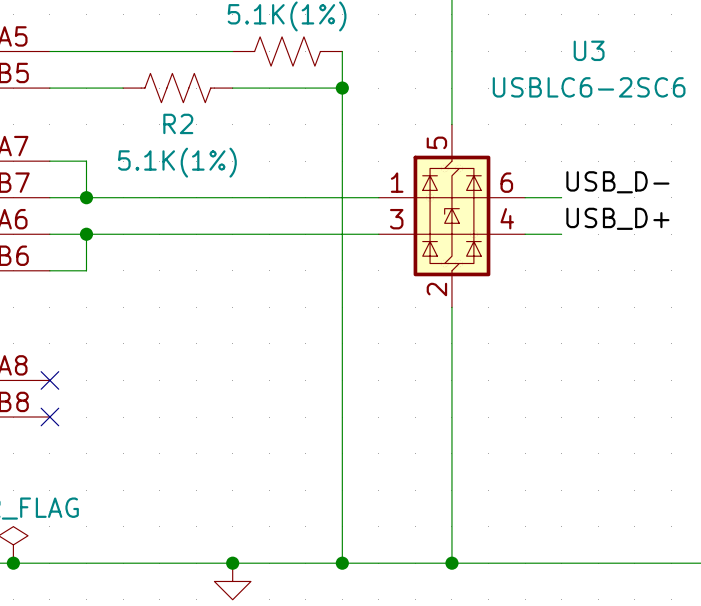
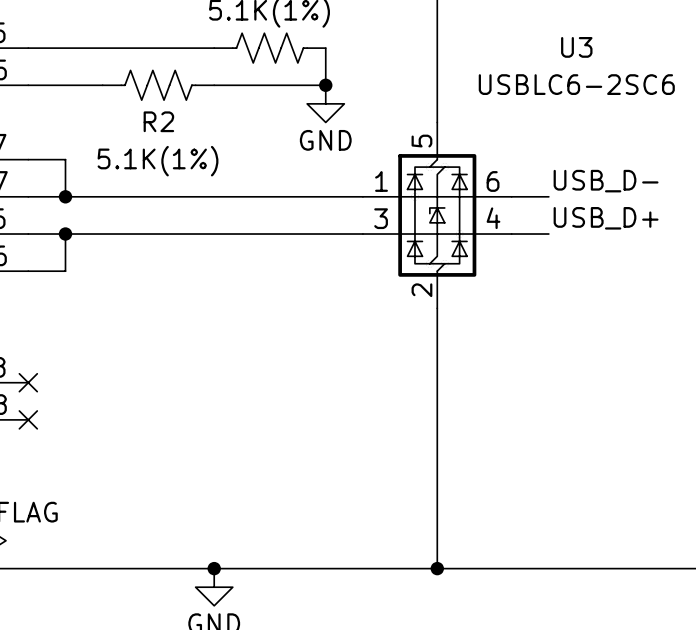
wire: (342, 88) (342, 563) -> none
power symbol: none -> GND (325, 103)
junction: (342, 563) -> none

